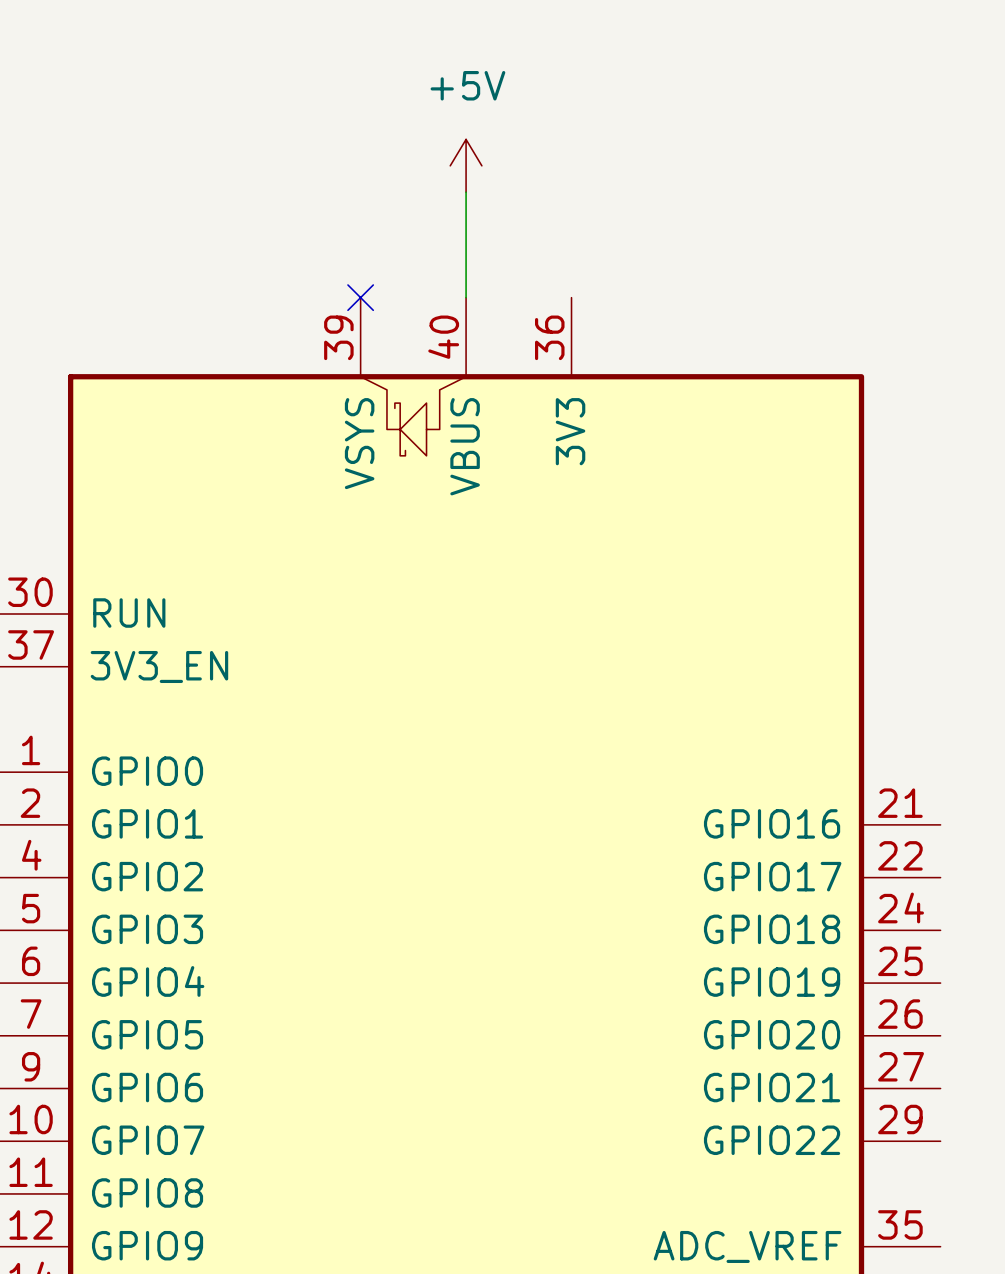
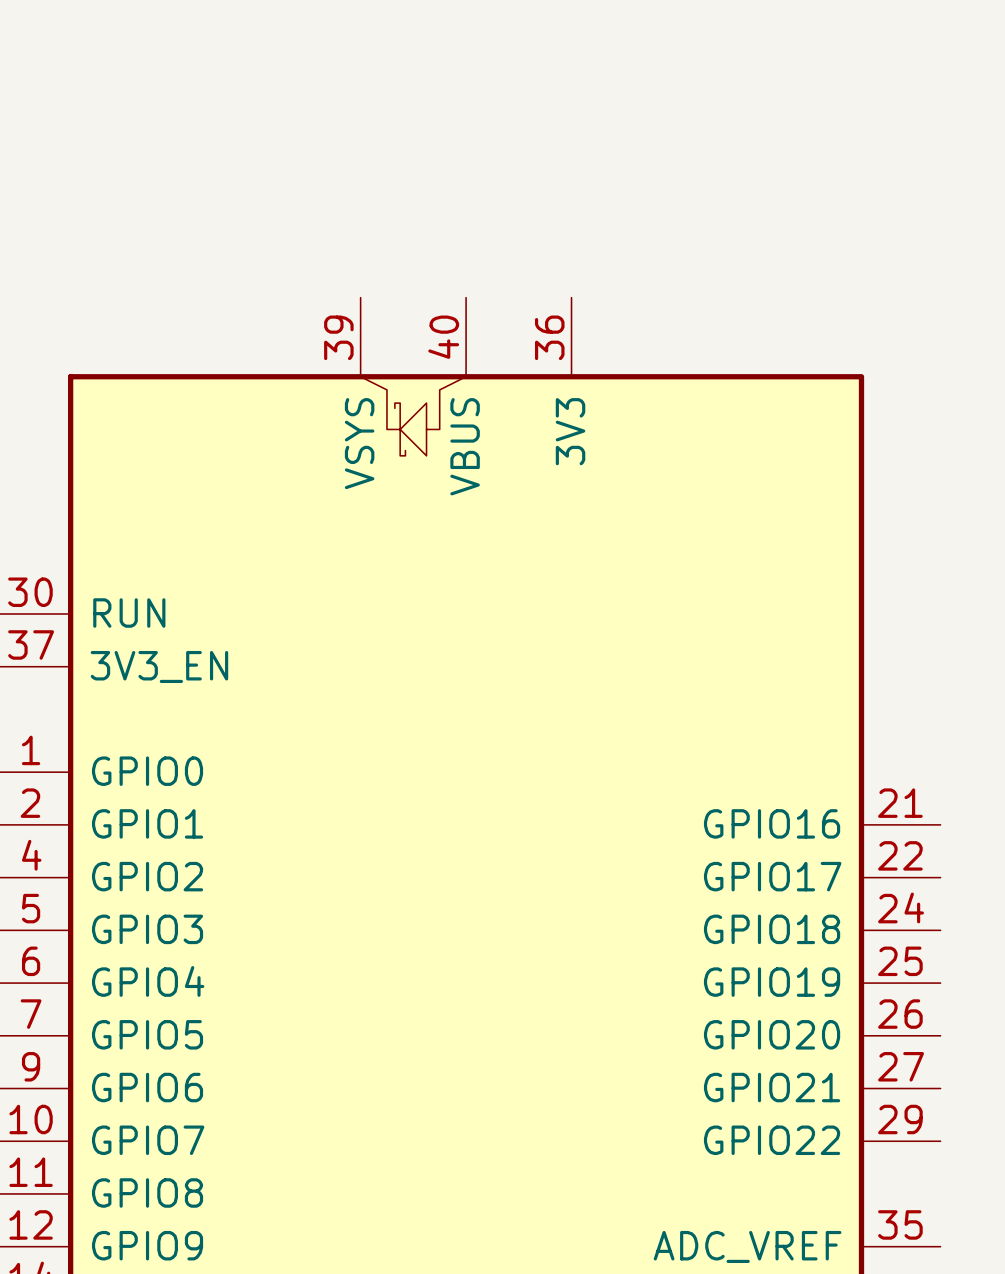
power symbol: +5V (466, 165) -> none
wire: (466, 192) (466, 297) -> none
no-connect mark: (360, 297) -> none

